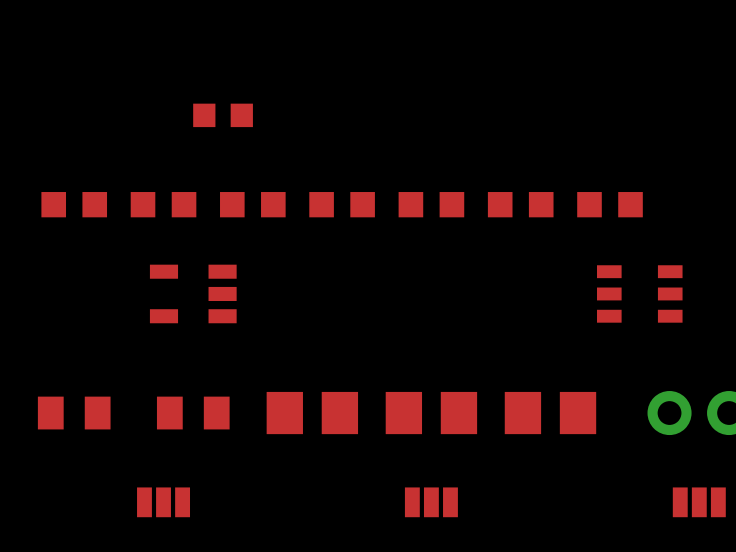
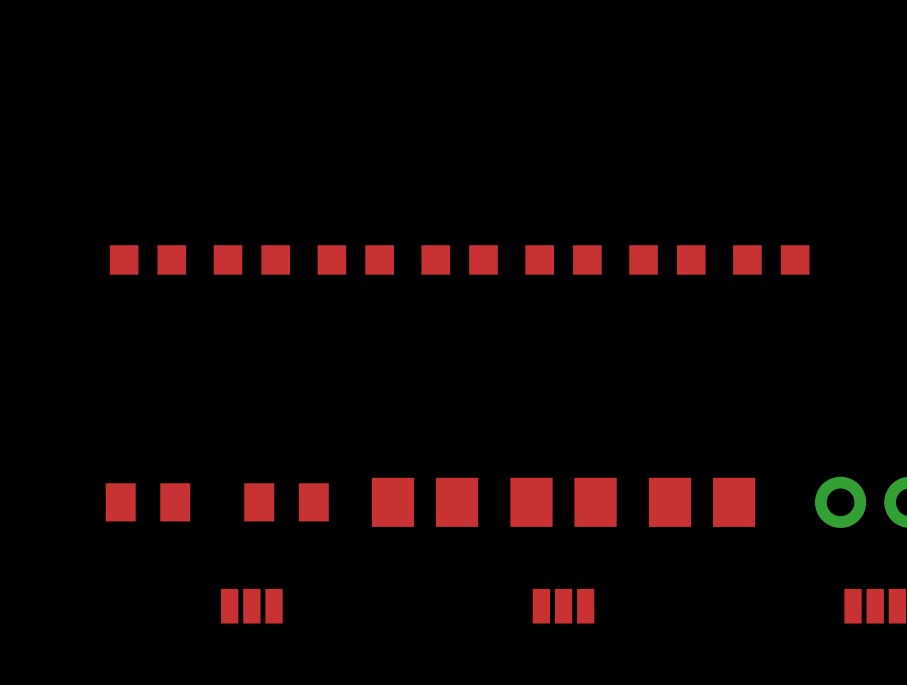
part: (223, 115) -> none
part: (193, 293) -> none
part: (639, 293) -> none

